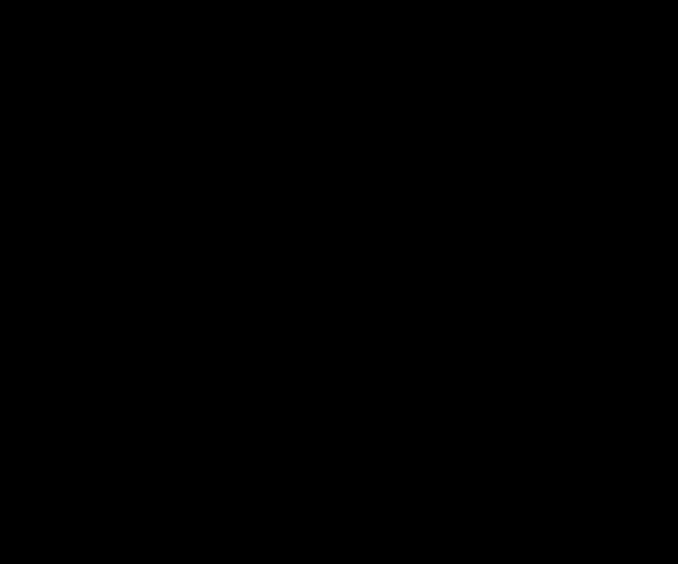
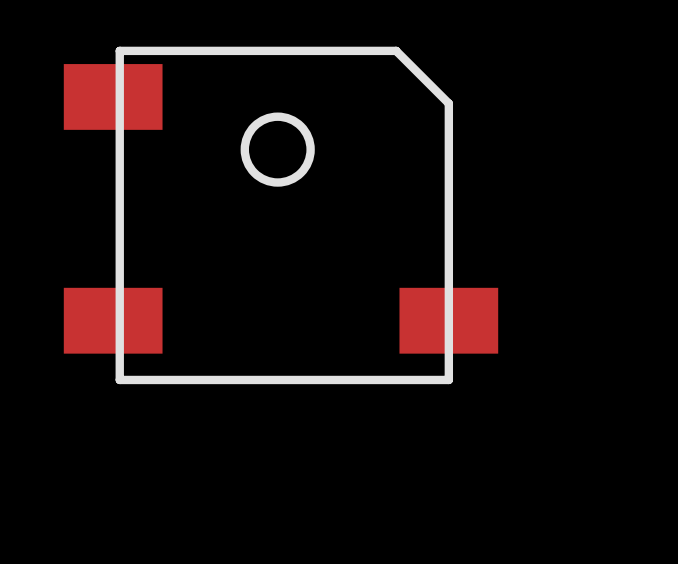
part: none -> (281, 215)

